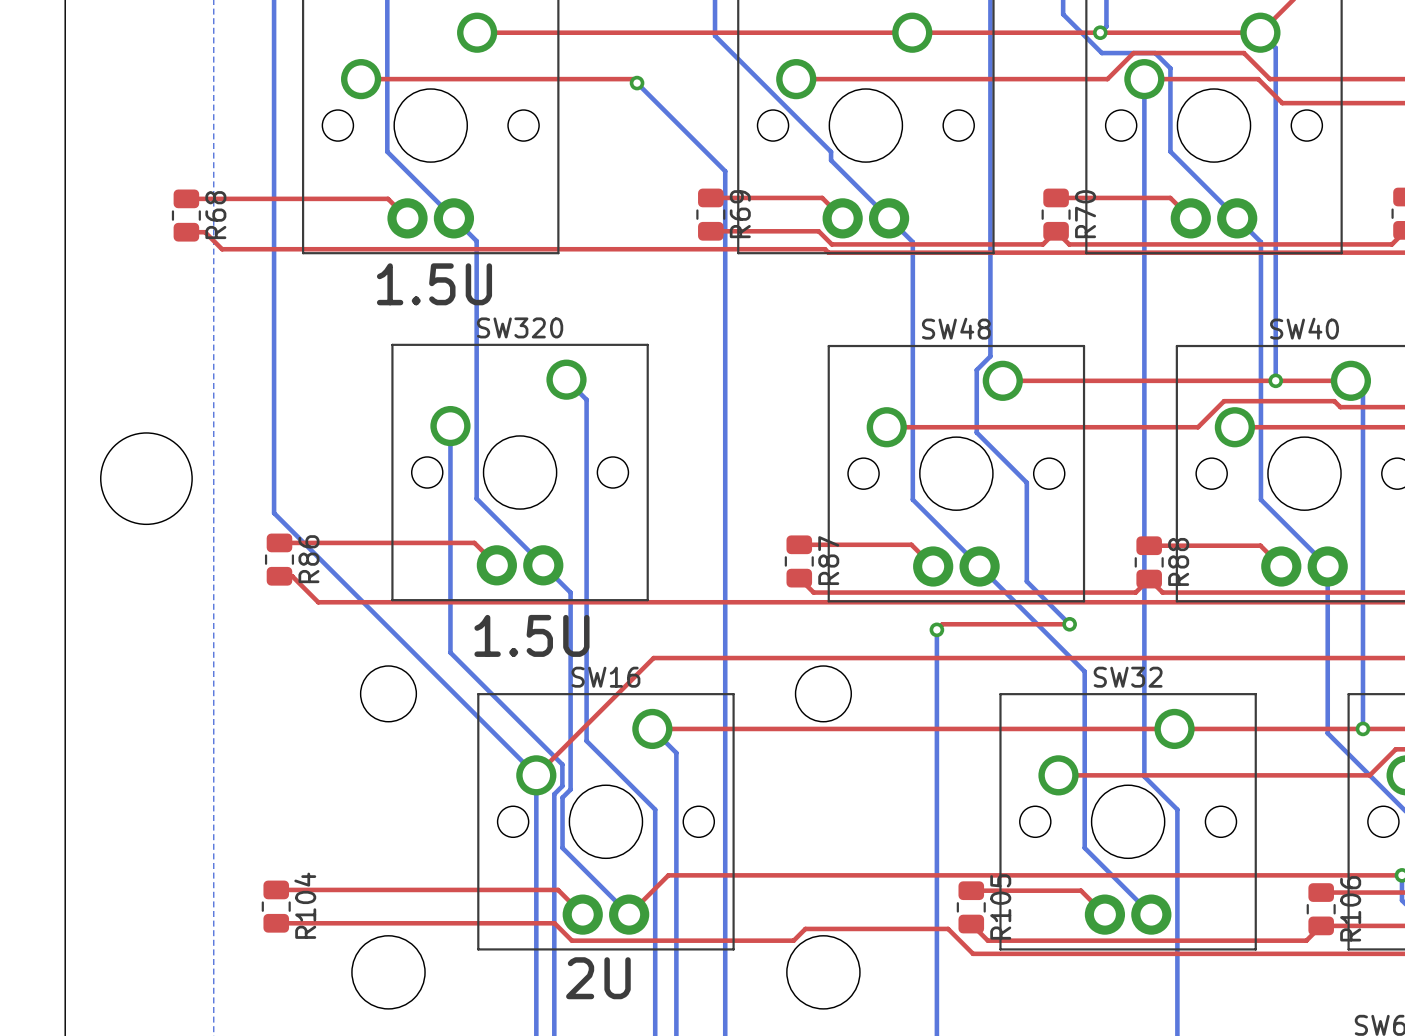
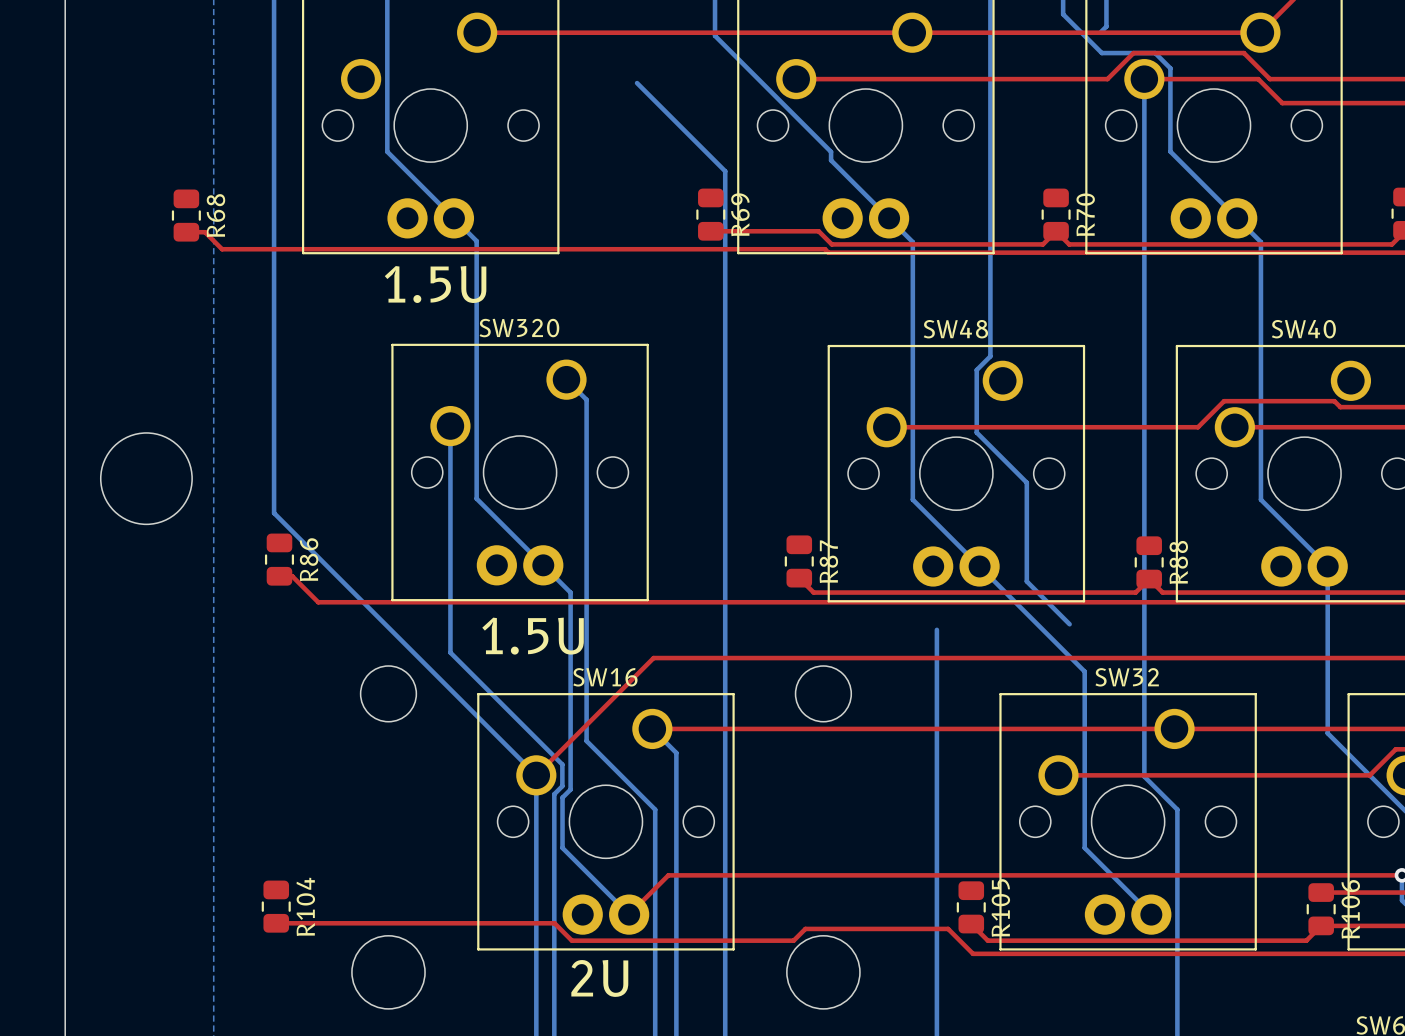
via: (1100, 32) -> none
bottom track: (1260, 32) (1275, 48) (1275, 380) -> none
top track: (361, 79) (633, 79) (637, 83) -> none
via: (637, 83) -> none
top track: (710, 197) (822, 197) (842, 218) -> none
top track: (1056, 197) (1170, 197) (1190, 218) -> none
top track: (186, 198) (388, 198) (407, 218) -> none
top track: (1002, 380) (1350, 380) -> none
via: (1275, 380) -> none
bottom track: (1350, 380) (1362, 392) (1362, 728) -> none
top track: (279, 542) (474, 542) (496, 565) -> none
top track: (799, 544) (911, 544) (933, 566) -> none
top track: (1149, 545) (1260, 545) (1281, 566) -> none
top track: (1069, 624) (942, 624) (936, 629) -> none
via: (1069, 624) -> none
via: (936, 629) -> none
via: (1362, 728) -> none
top track: (276, 889) (558, 889) (582, 914) -> none
top track: (971, 890) (1081, 890) (1104, 914) -> none

